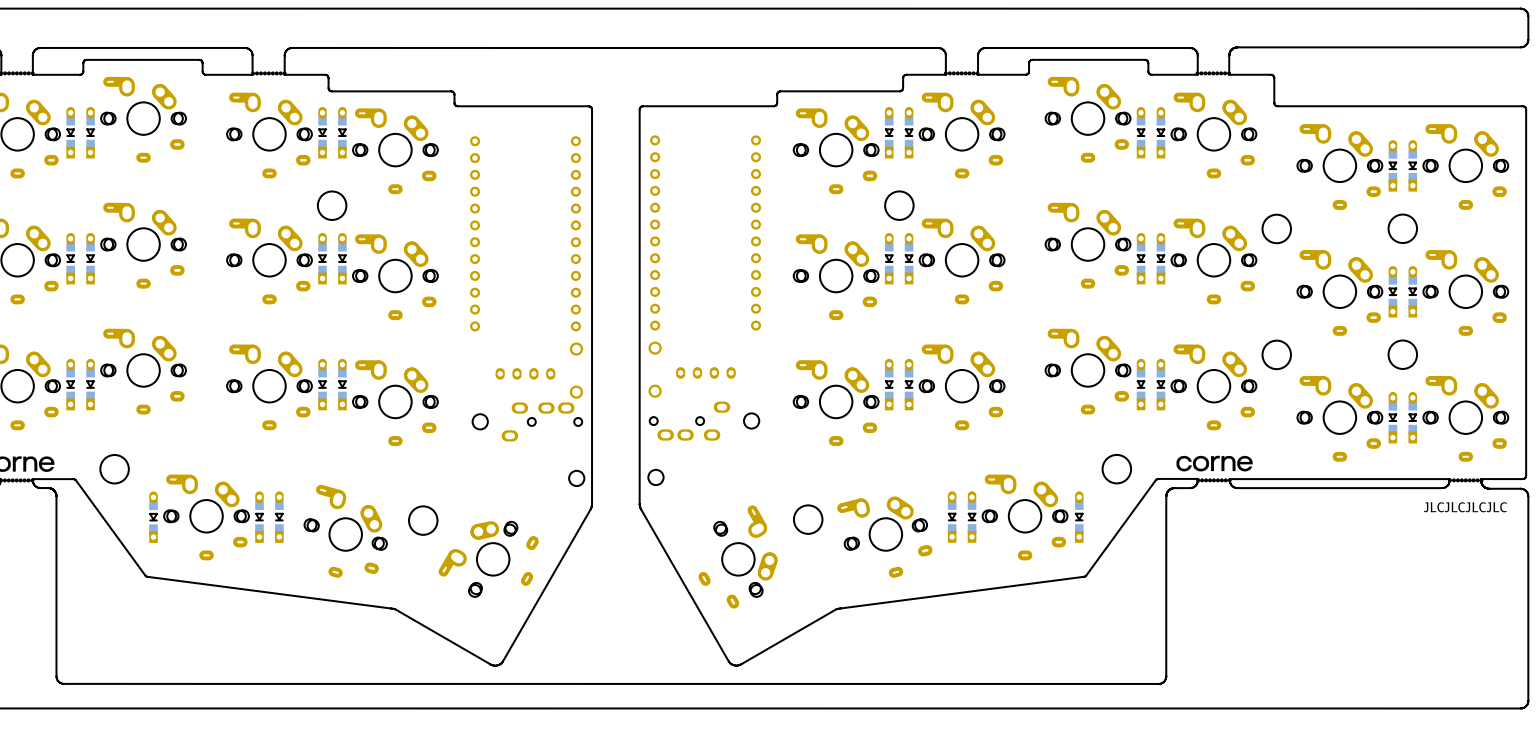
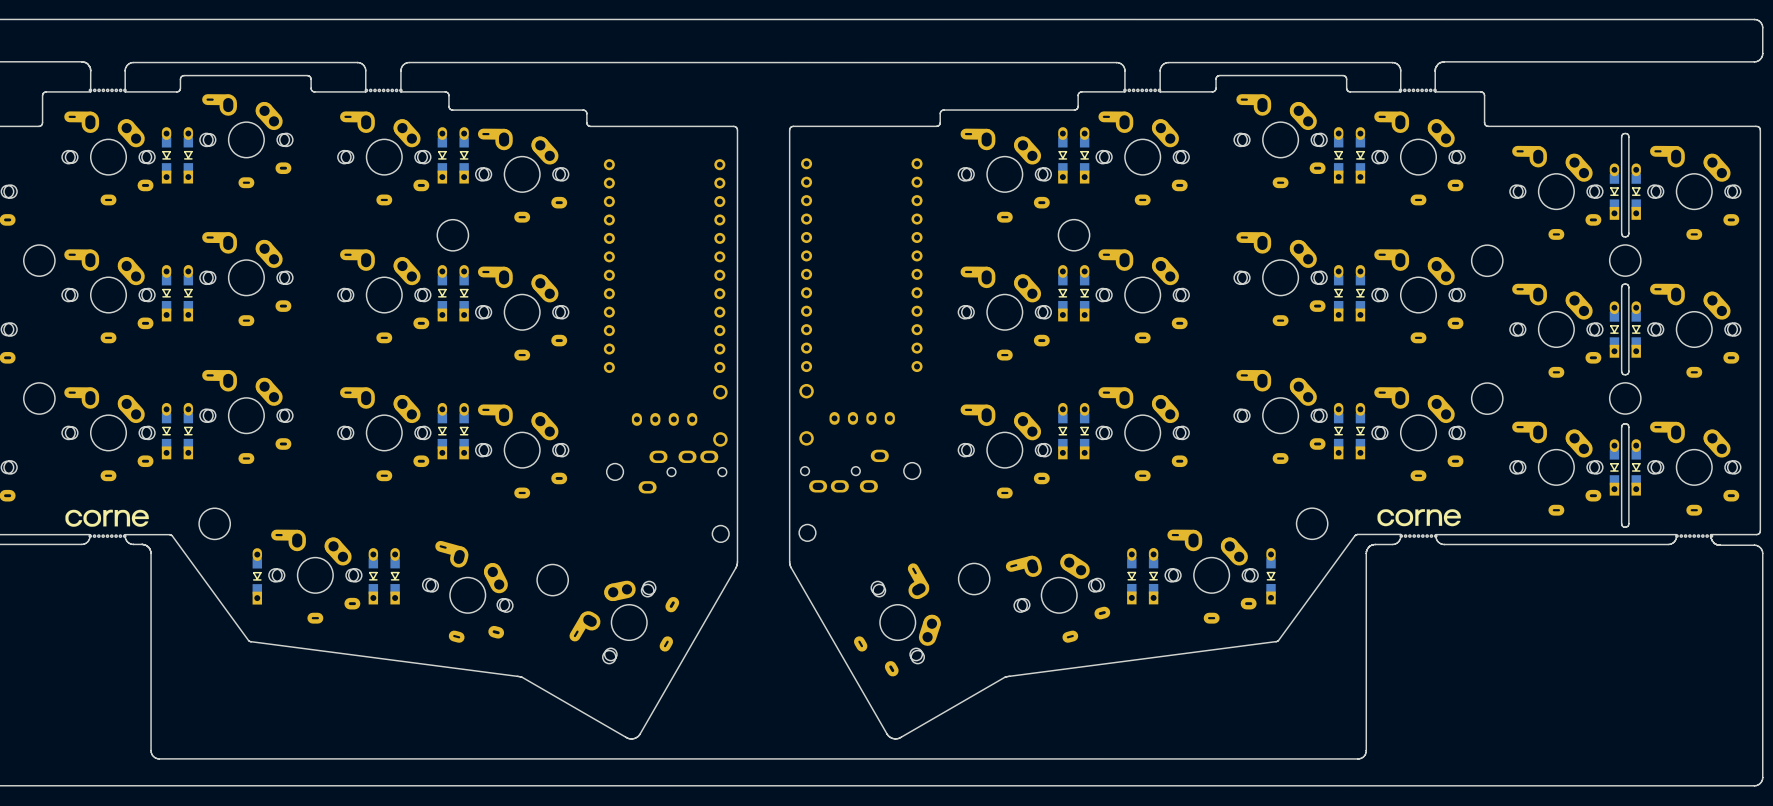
board edge: none -> (1625, 133) (1621, 137) (1621, 233) (1625, 236) (1628, 233) (1628, 137) (1625, 133)
board edge: none -> (1625, 284) (1628, 287) (1628, 371) (1625, 374) (1621, 371) (1621, 287) (1625, 284)
board edge: none -> (1625, 423) (1628, 427) (1628, 523) (1625, 527) (1621, 523) (1621, 427) (1625, 423)
text: JLCJLCJLCJLC (1465, 507) -> none

